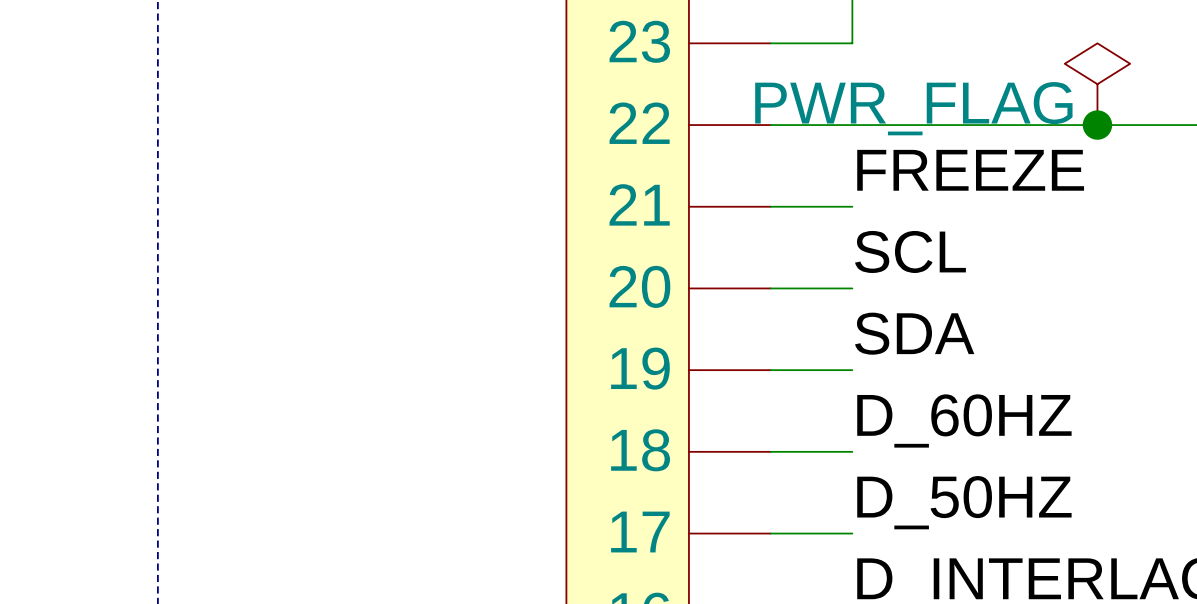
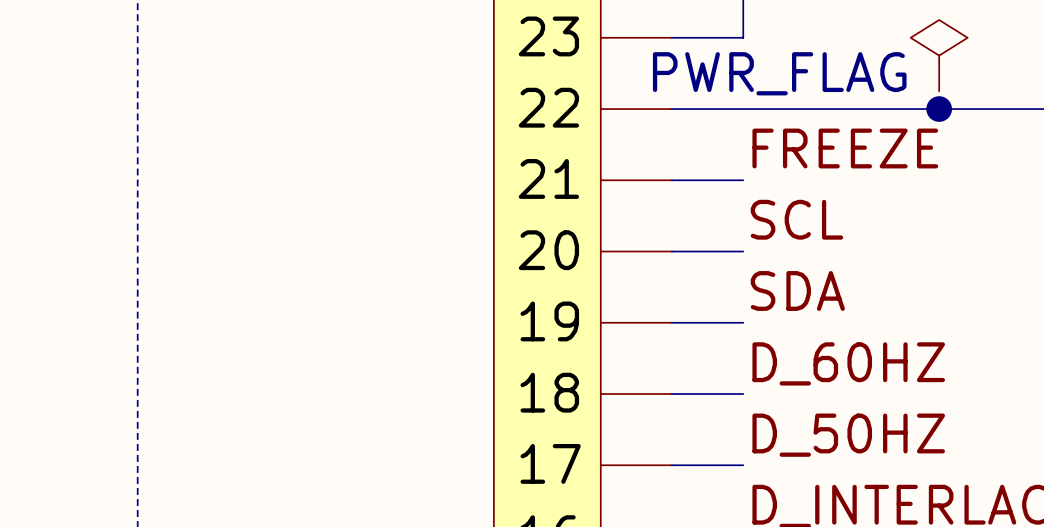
power symbol position: PWR_FLAG (1097, 84) -> PWR_FLAG (939, 55)
junction position: (1097, 125) -> (939, 109)

